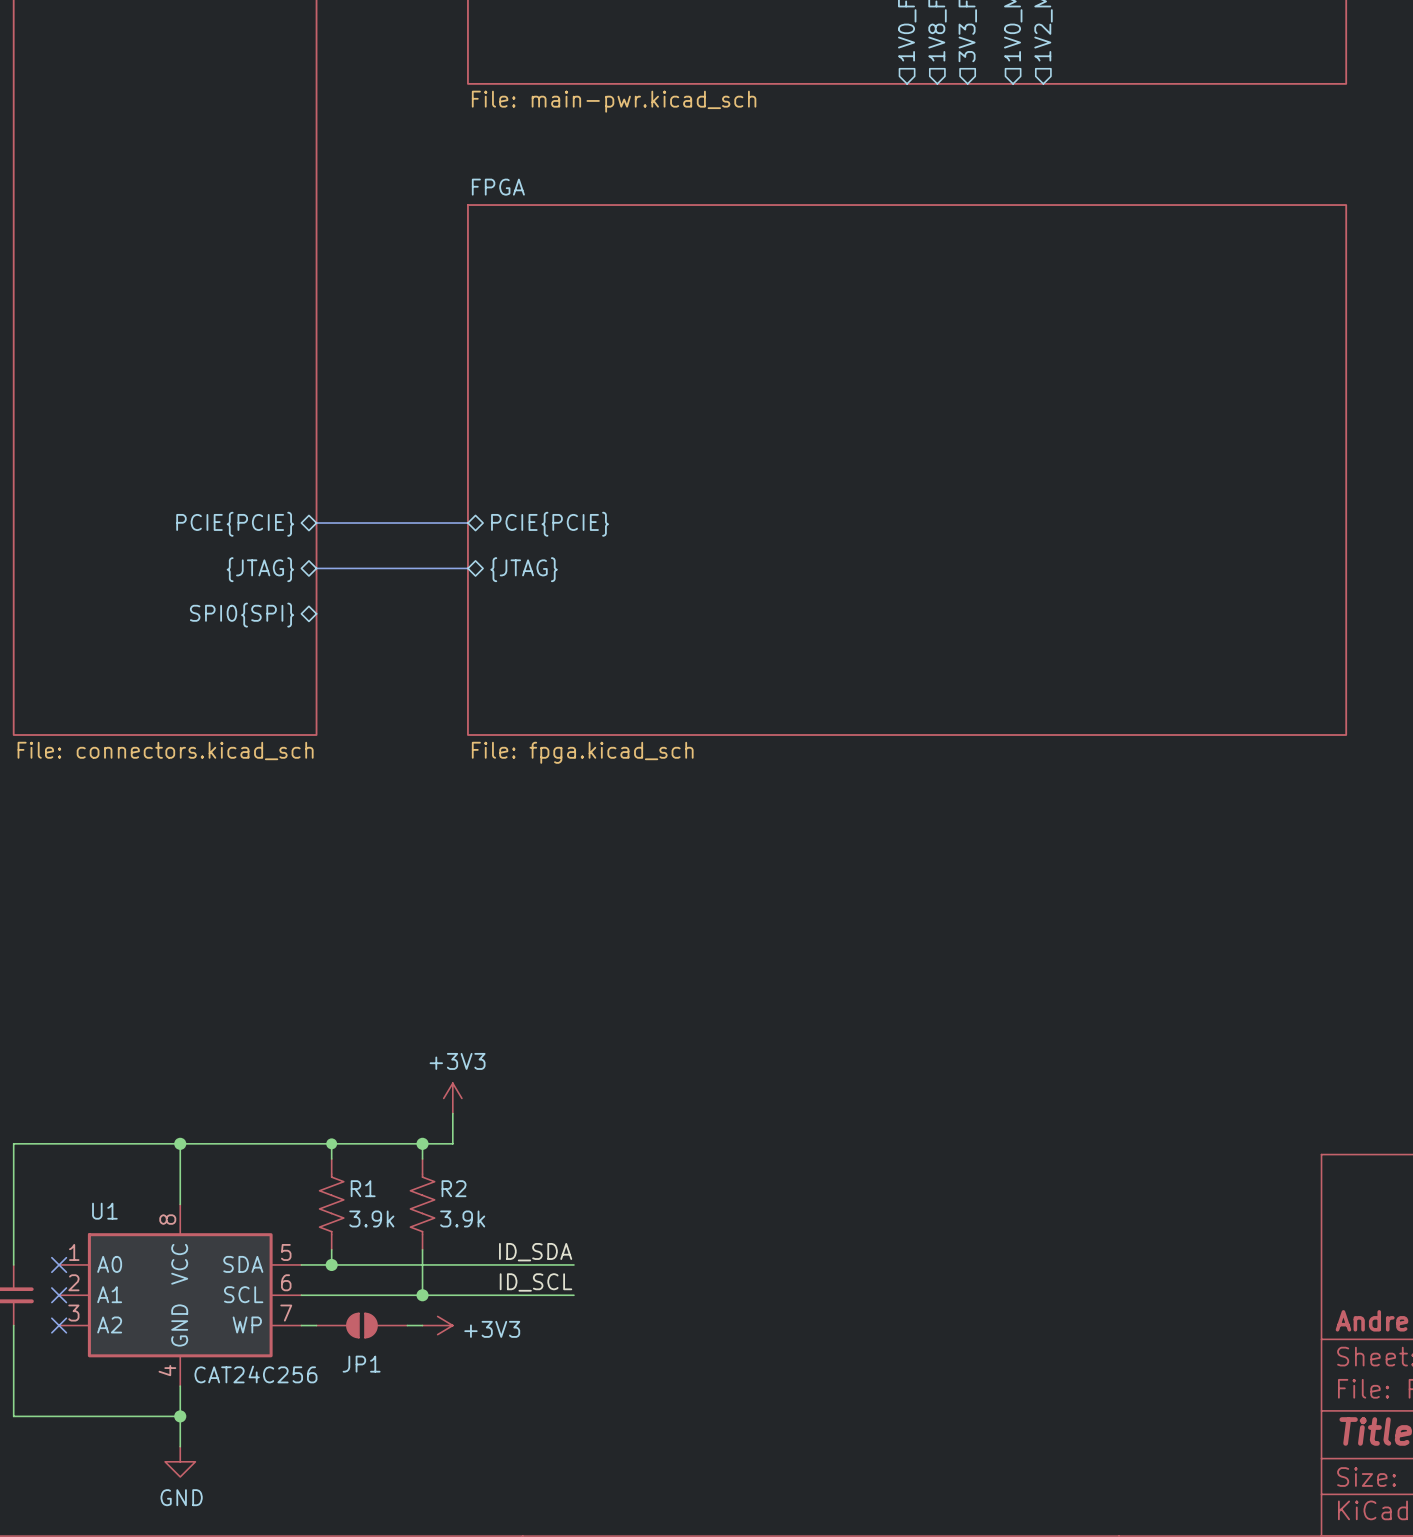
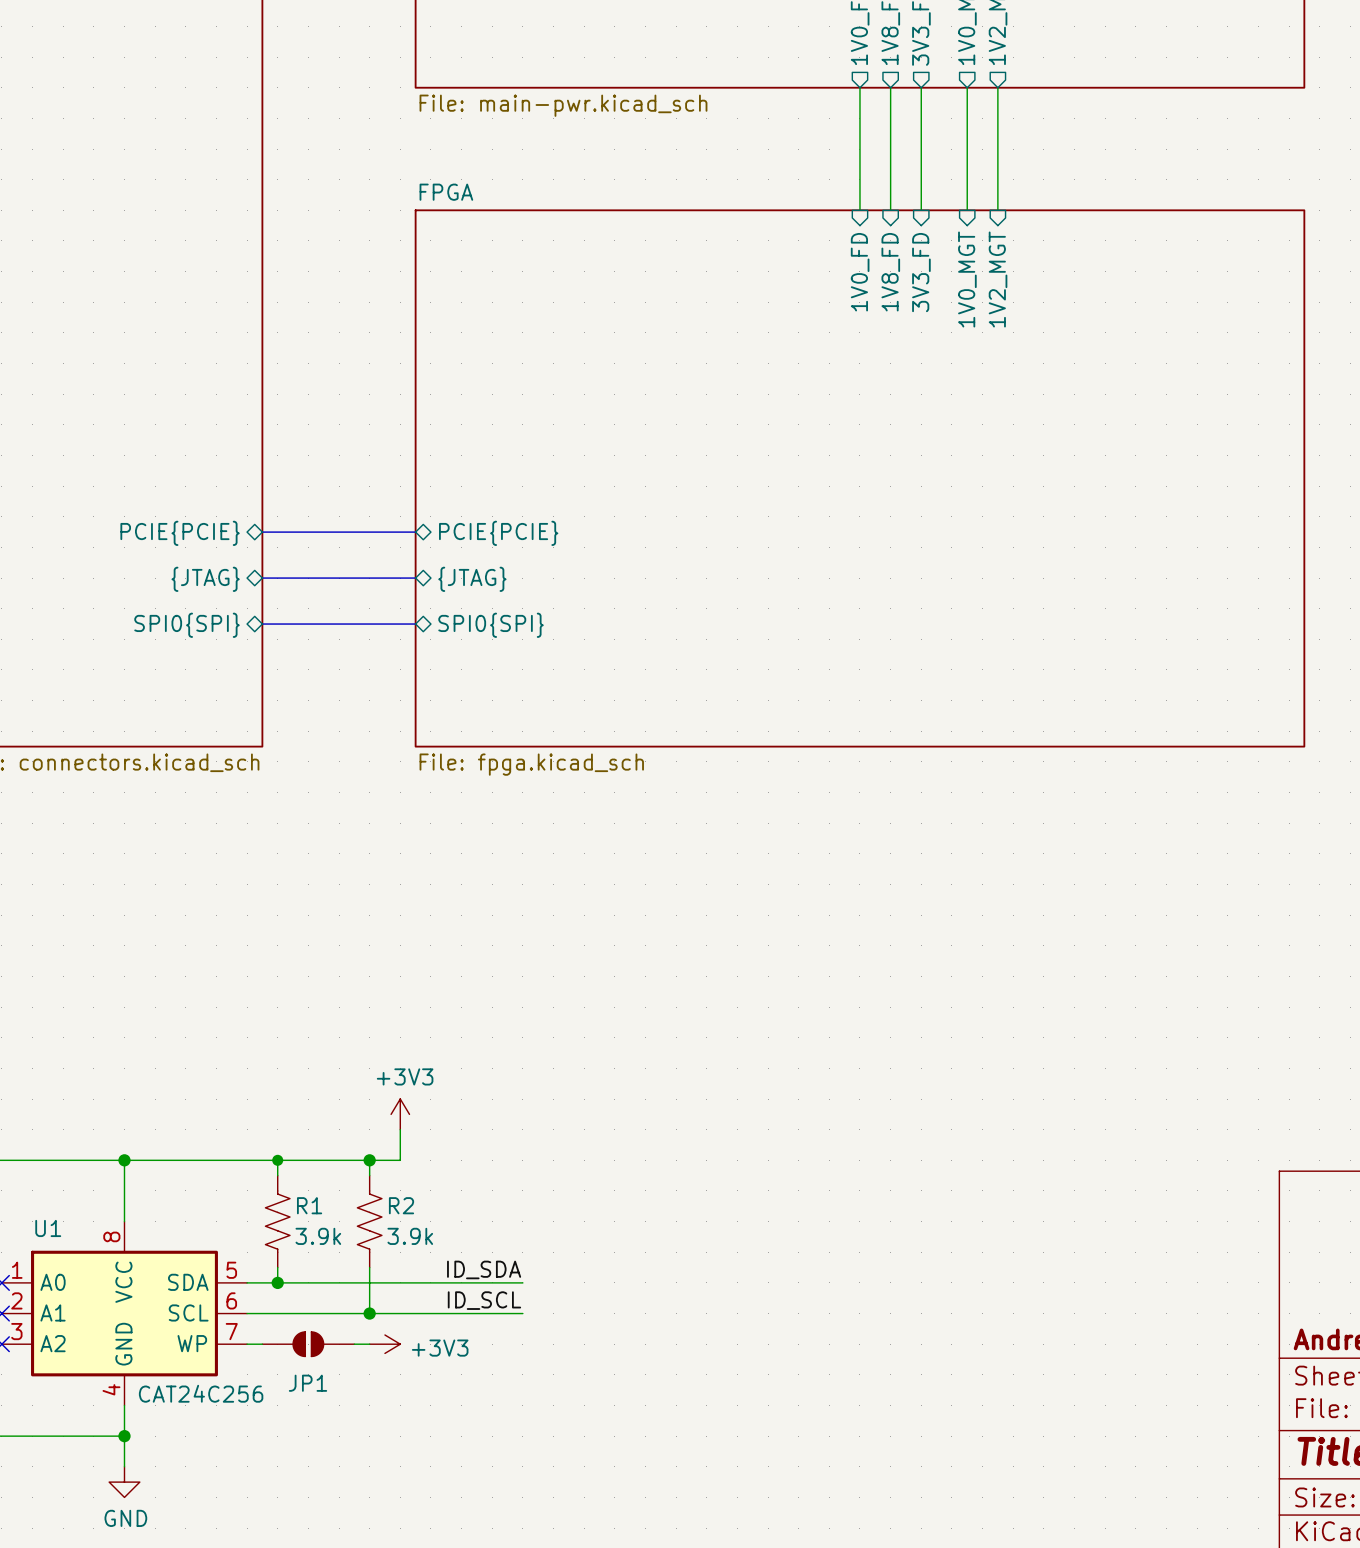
wire: none -> (859, 87) (859, 210)
wire: none -> (890, 87) (890, 210)
wire: none -> (921, 87) (921, 210)
wire: none -> (967, 87) (967, 210)
wire: none -> (997, 87) (997, 210)
sheet pin: none -> 1V0_FD (860, 272)
sheet pin: none -> 1V8_FD (890, 272)
sheet pin: none -> 3V3_FD (921, 272)
sheet pin: none -> 1V0_MGT (967, 279)
sheet pin: none -> 1V2_MGT (998, 279)
bus: none -> (262, 624) (415, 624)
sheet pin: none -> SPI0{SPI} (491, 625)

